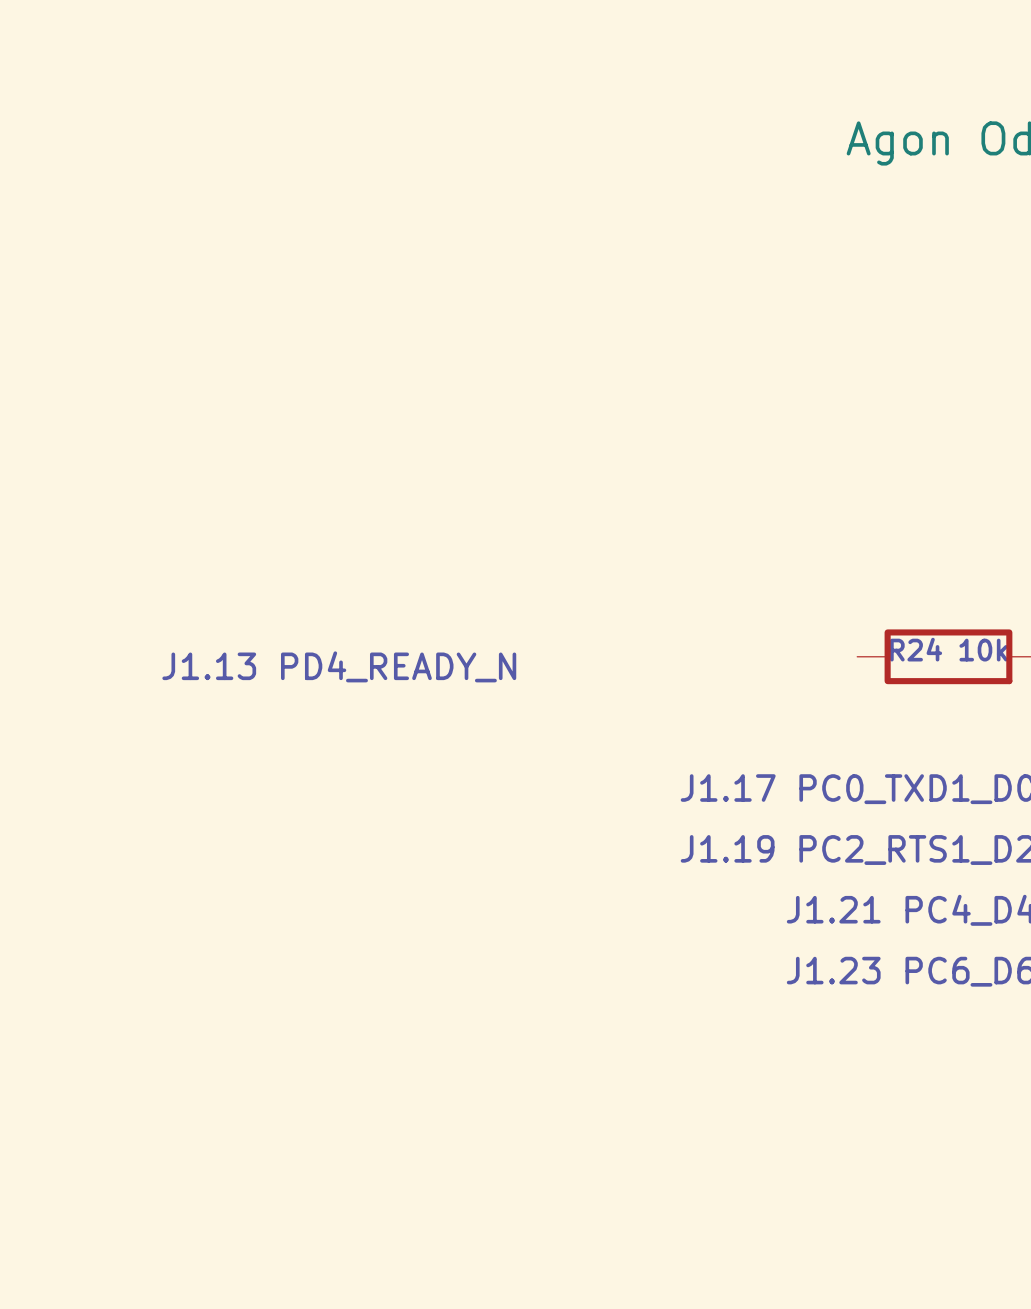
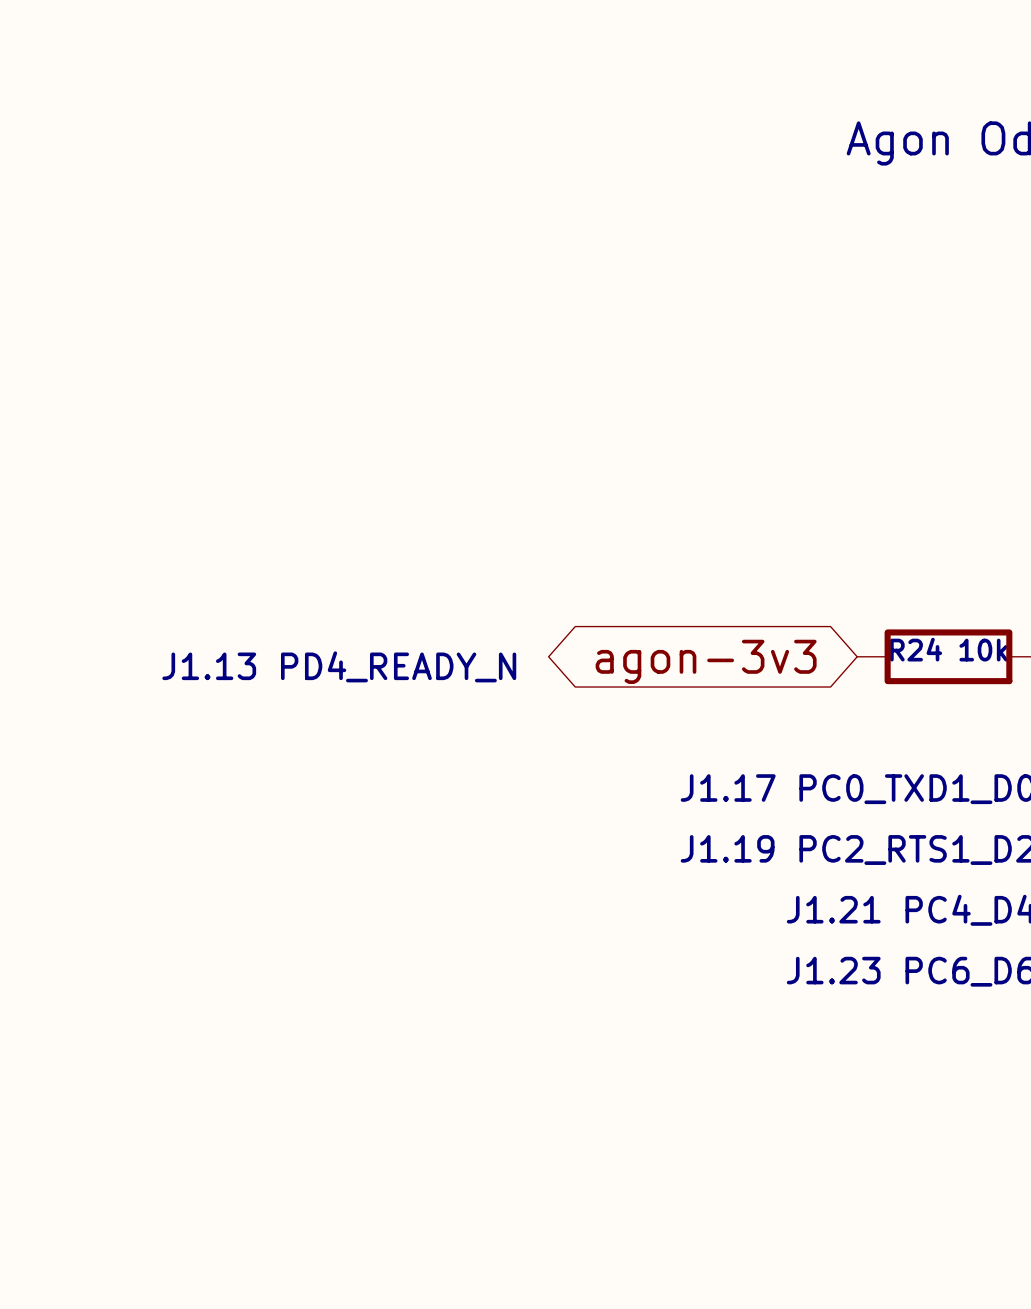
global label: none -> agon-3v3 (706, 661)

